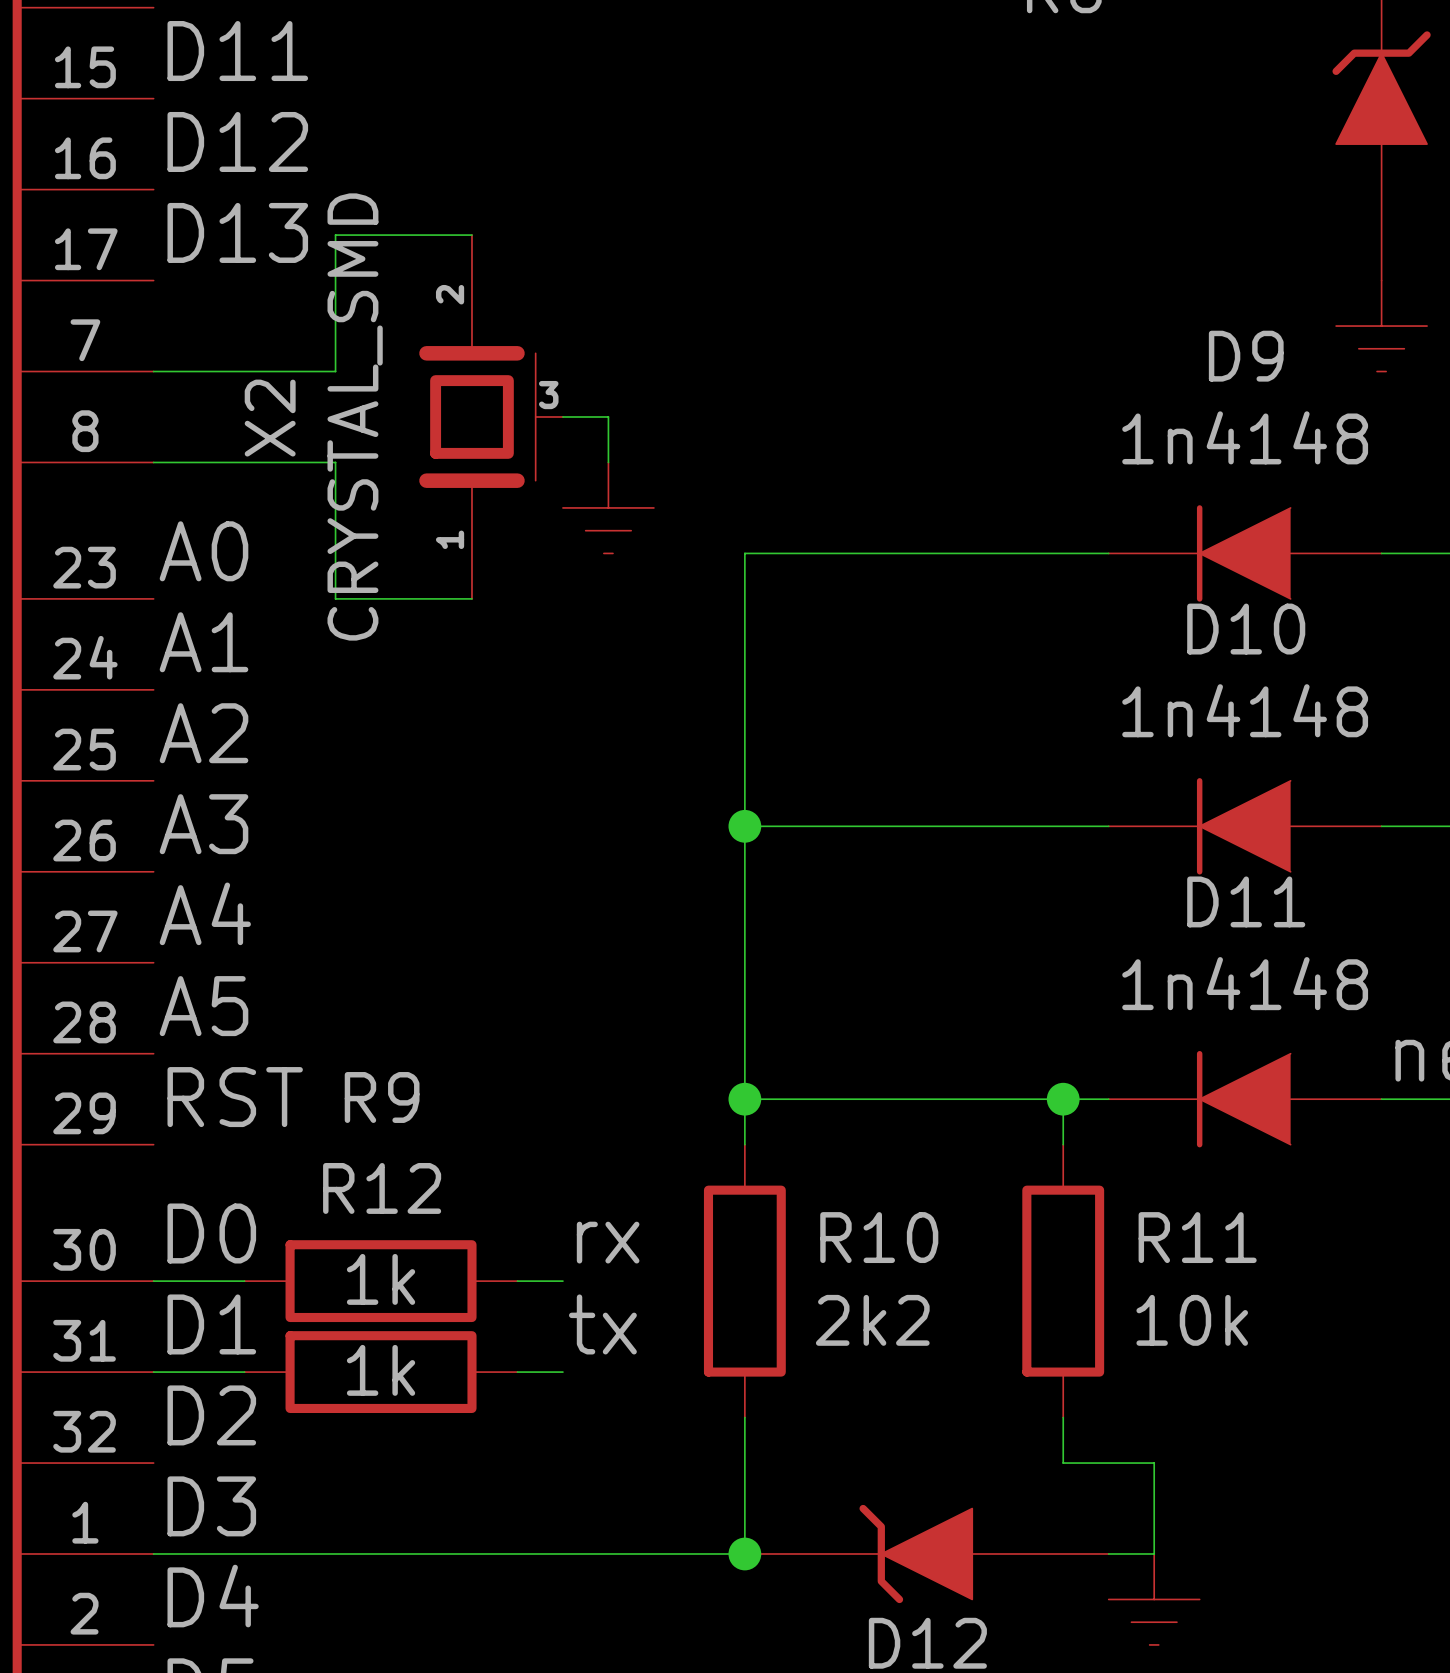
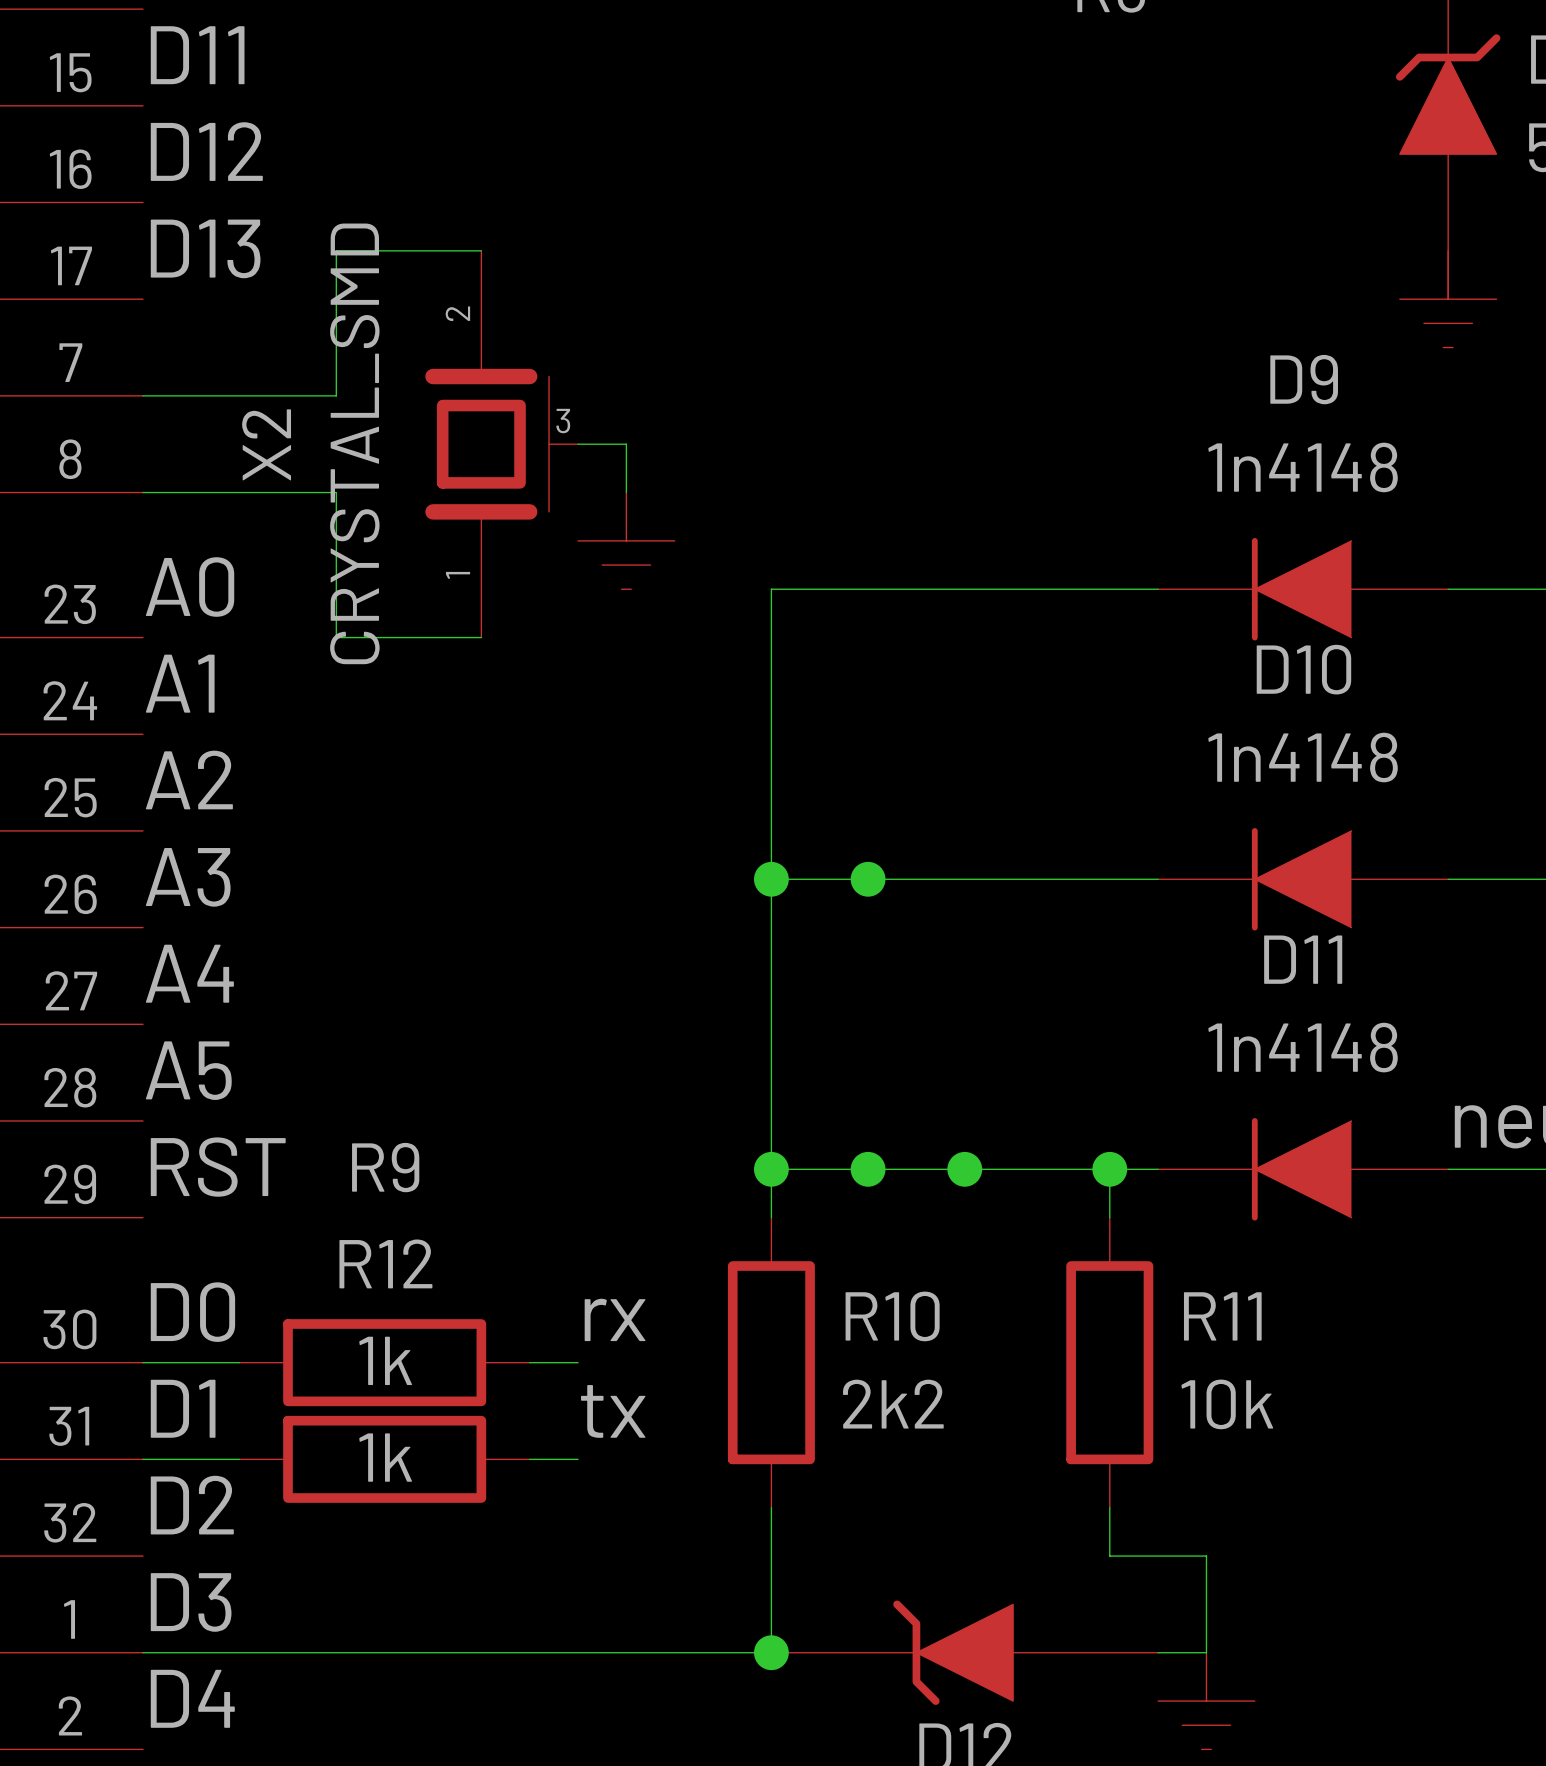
power symbol position: (1381, 326) -> (1448, 299)
junction: none -> (868, 879)
junction: none -> (868, 1169)
junction: none -> (964, 1169)

